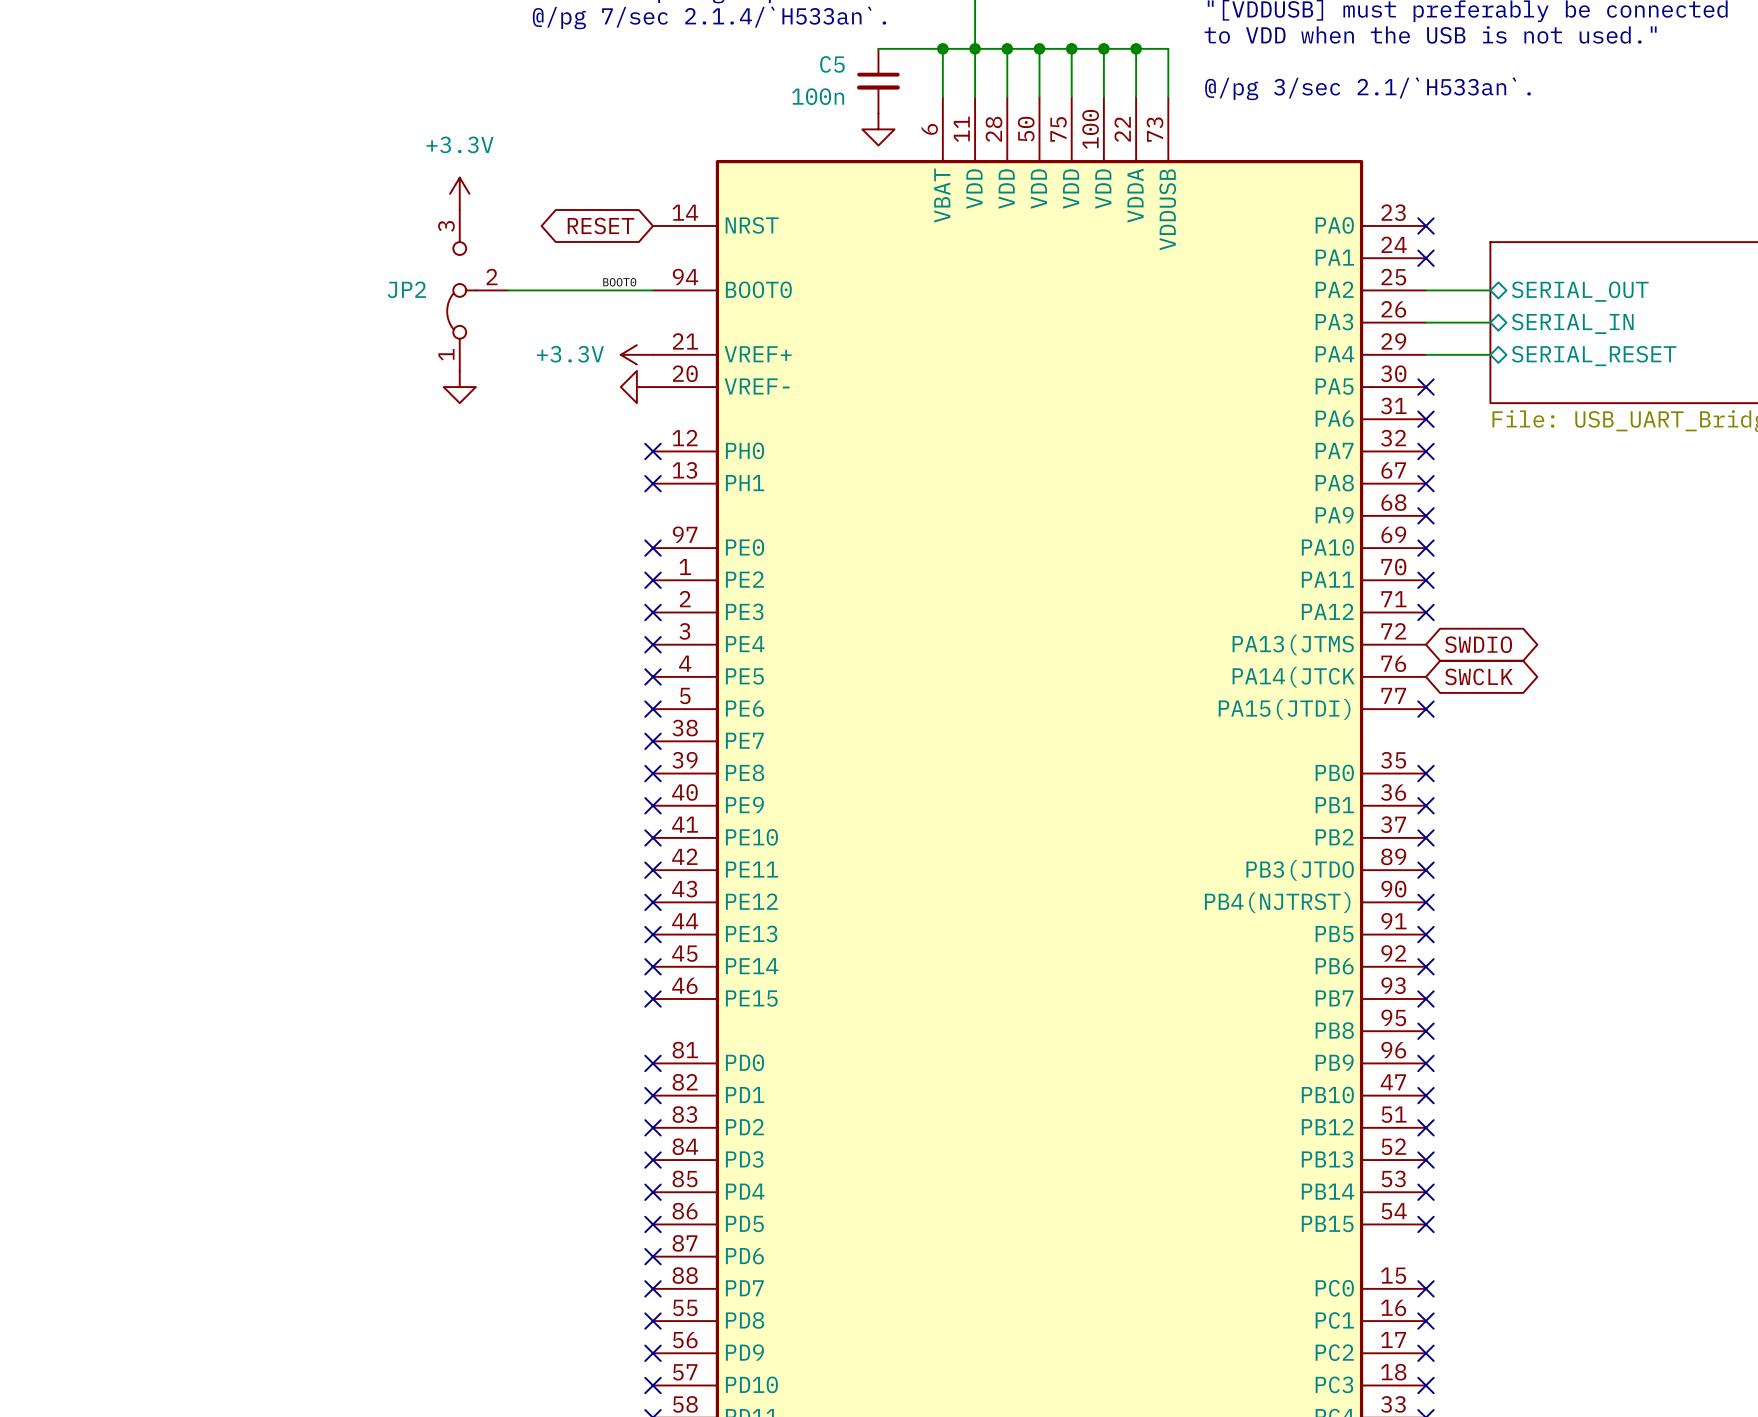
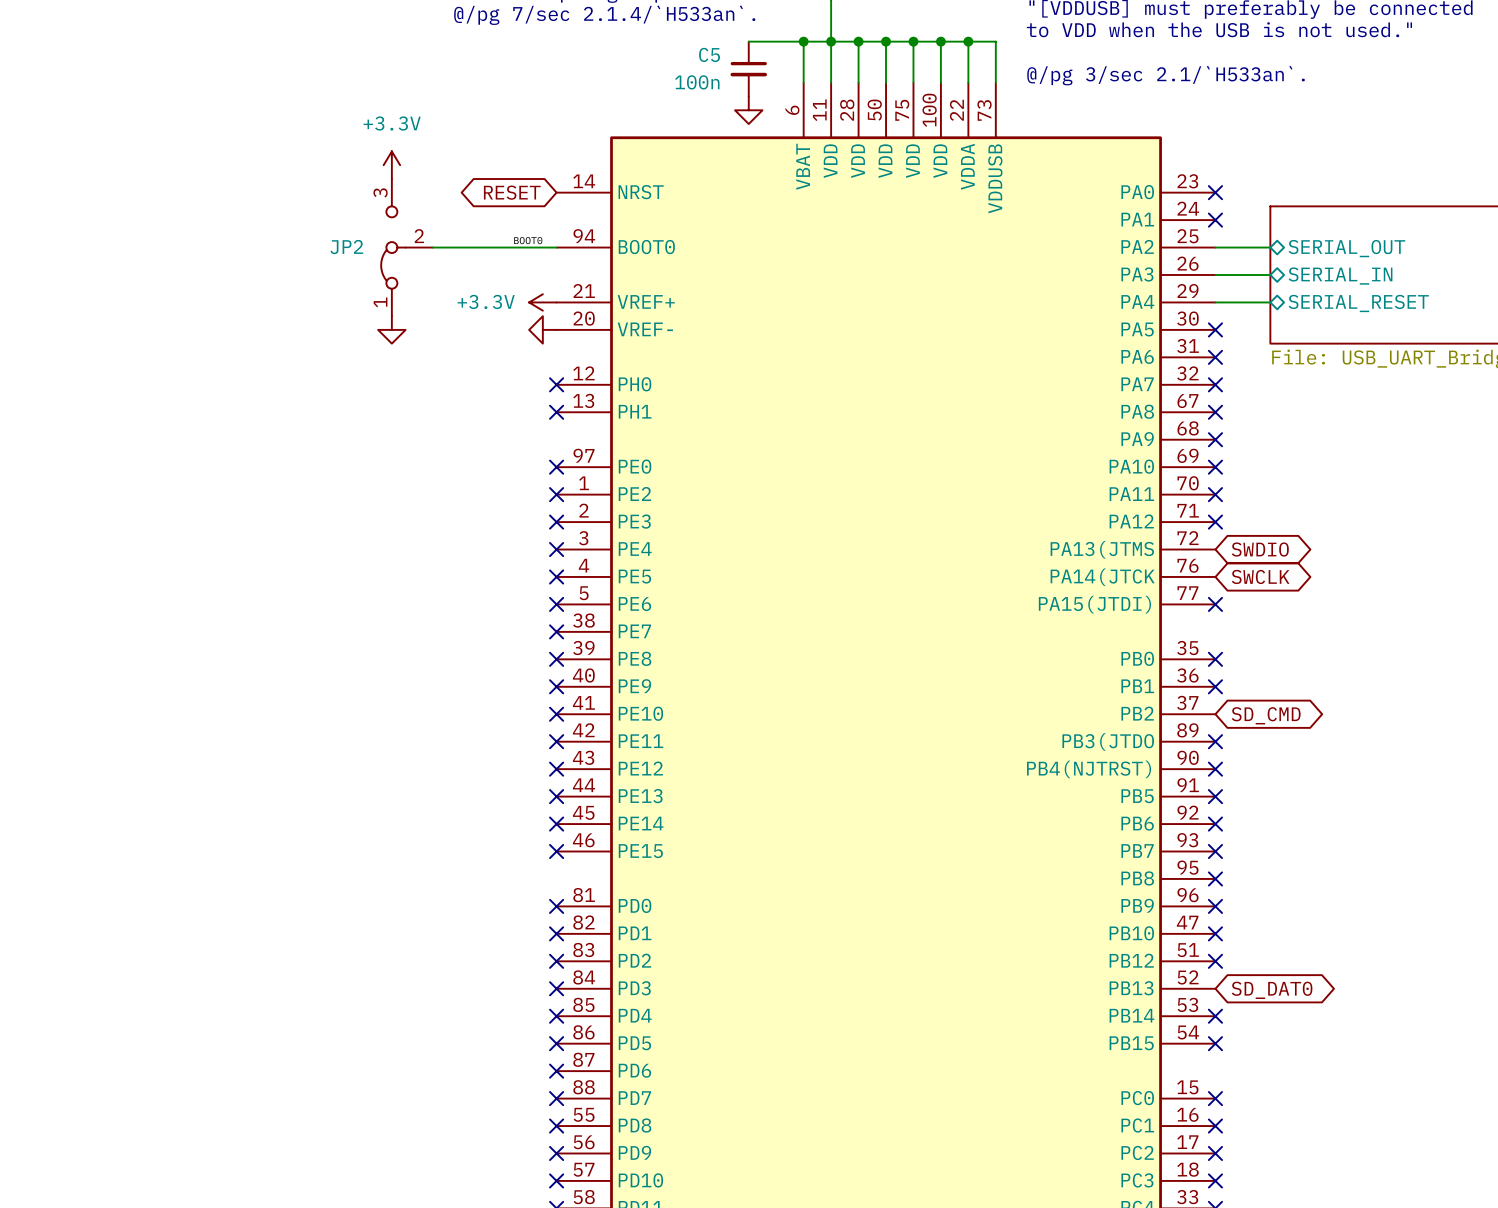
no-connect mark: (1425, 837) -> none
global label: none -> SD_CMD (1266, 715)
no-connect mark: (1425, 1160) -> none
global label: none -> SD_DAT0 (1272, 990)

